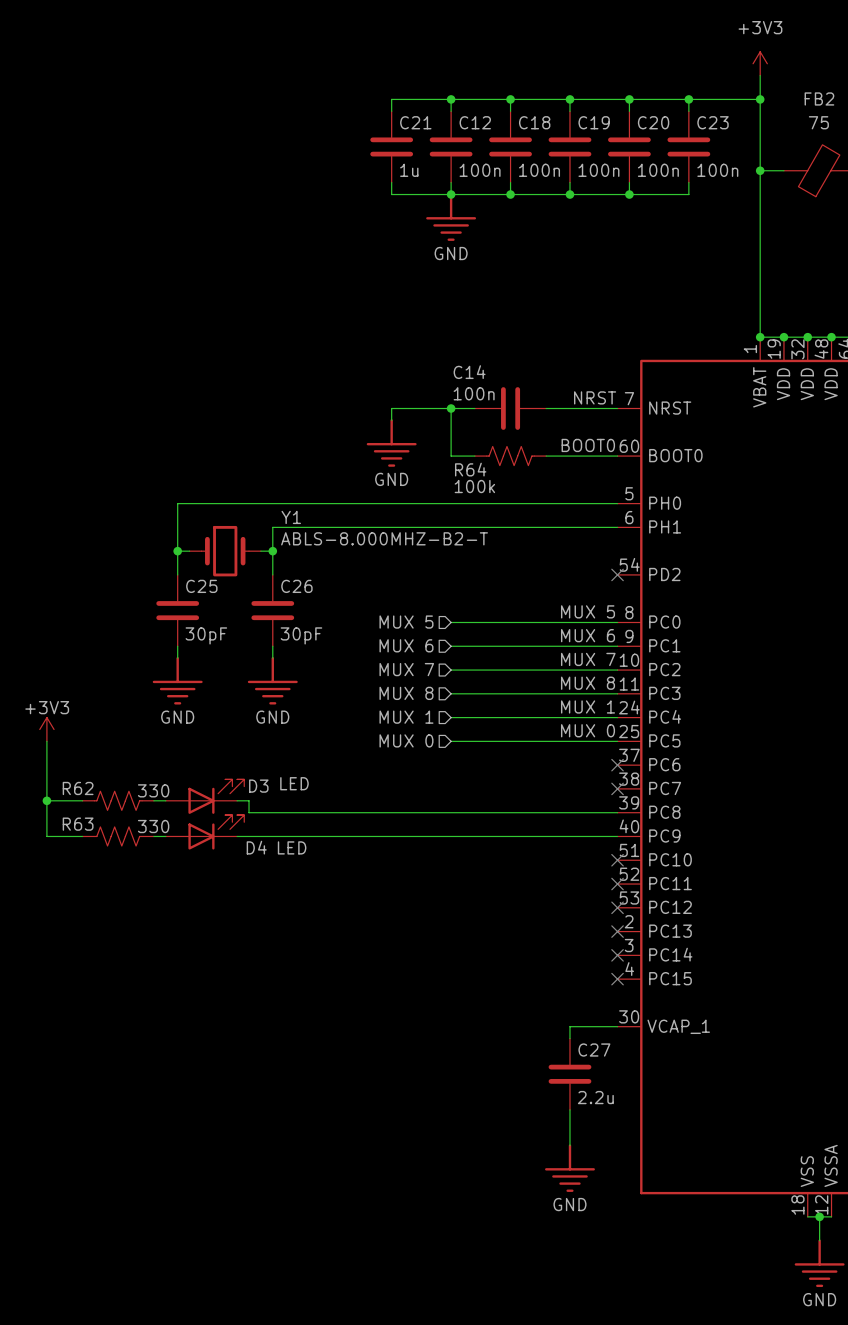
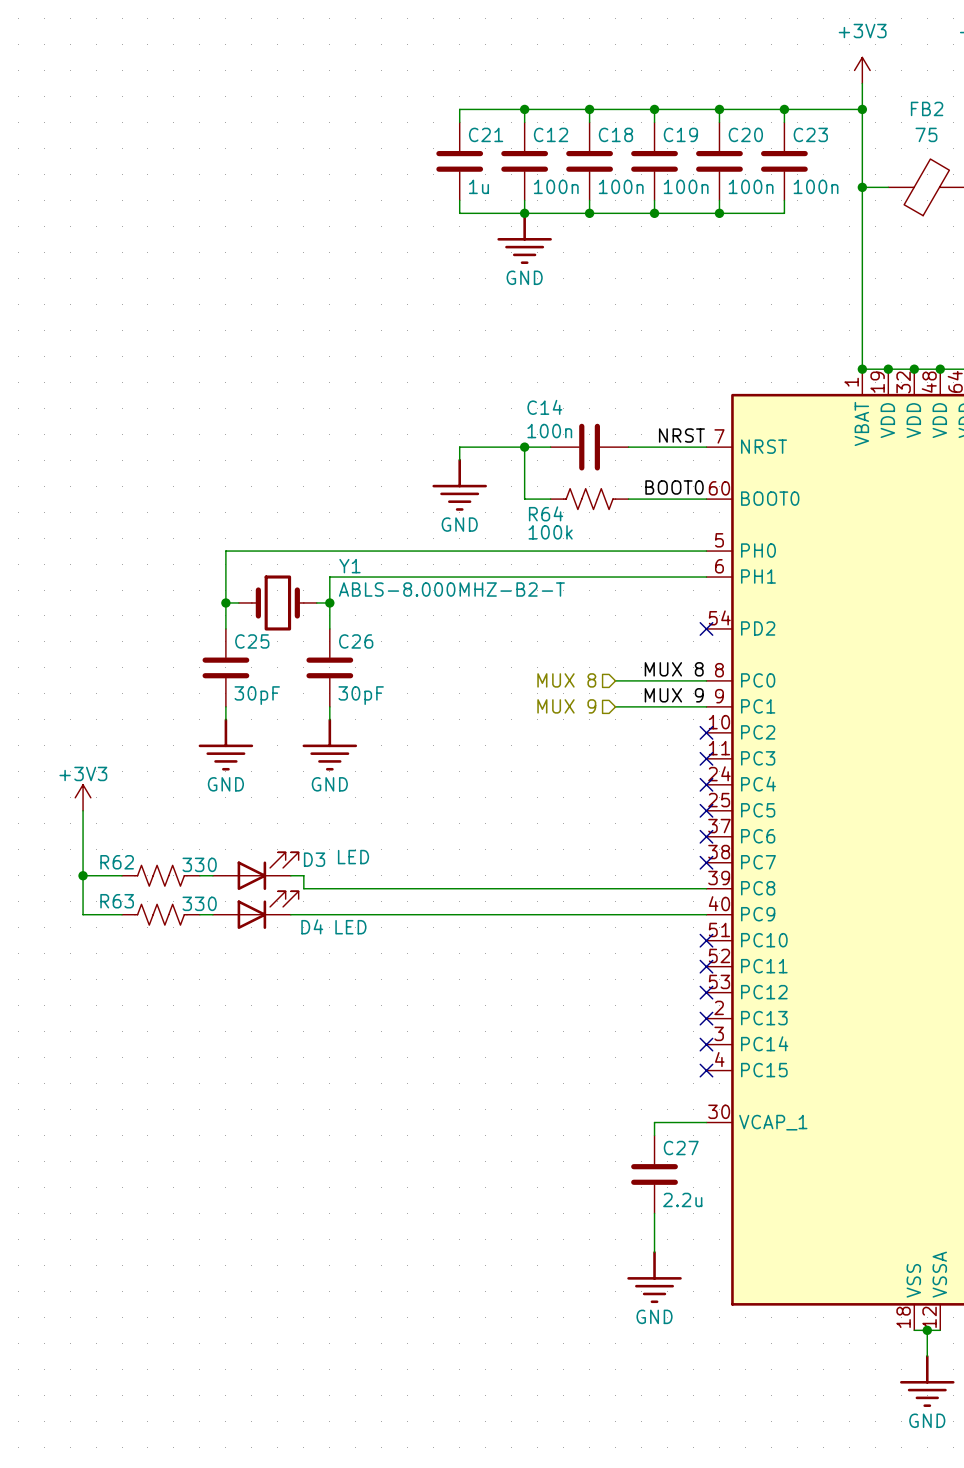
label: MUX 5 (588, 611) -> MUX 8 (674, 669)
hierarchical label: MUX 5 (406, 622) -> none
wire: (451, 622) (534, 622) -> none
label: MUX 6 (588, 635) -> MUX 9 (674, 695)
hierarchical label: MUX 6 (406, 645) -> none
hierarchical label: none -> MUX 9 (566, 706)
wire: (451, 646) (534, 646) -> none
label: MUX 7 (588, 659) -> none
hierarchical label: MUX 7 (406, 669) -> none
wire: (451, 670) (617, 670) -> none
no-connect mark: none -> (706, 732)
label: MUX 8 (588, 683) -> none
hierarchical label position: MUX 8 (406, 693) -> MUX 8 (566, 680)
wire: (451, 693) (617, 693) -> none
no-connect mark: none -> (706, 758)
label: MUX 1 (588, 706) -> none
hierarchical label: MUX 1 (406, 717) -> none
wire: (451, 717) (617, 717) -> none
no-connect mark: none -> (706, 784)
label: MUX 0 (588, 730) -> none
hierarchical label: MUX 0 (406, 740) -> none
wire: (451, 741) (617, 741) -> none
no-connect mark: none -> (706, 810)

